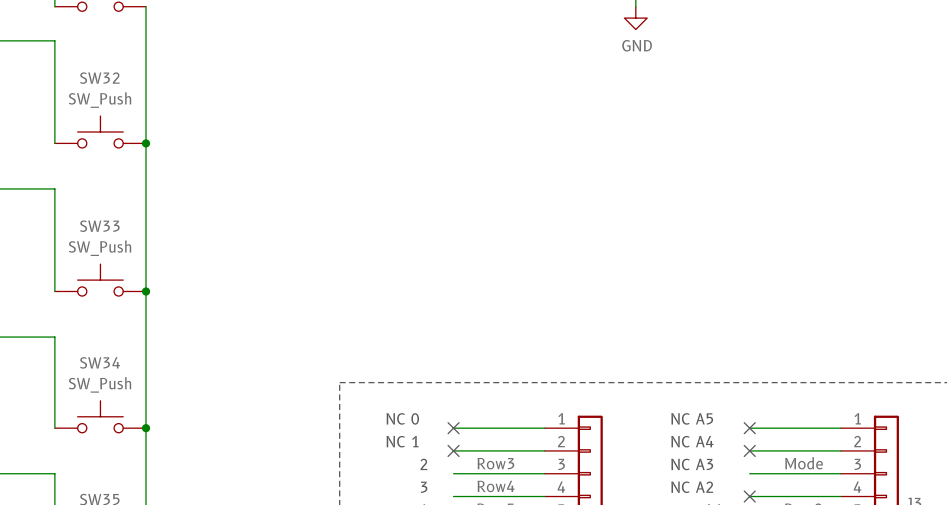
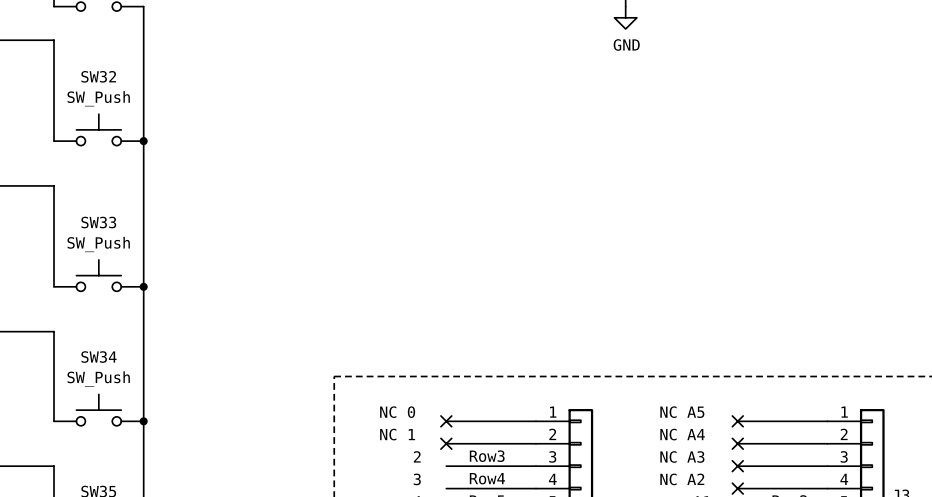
label: Mode (804, 463) -> none
no-connect mark: none -> (737, 466)

